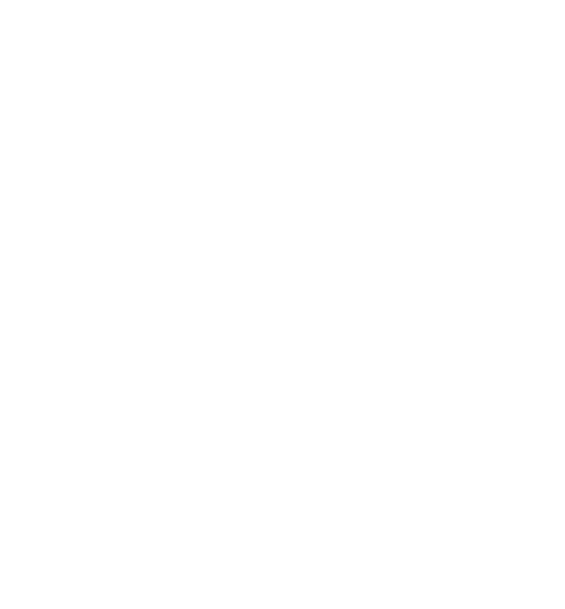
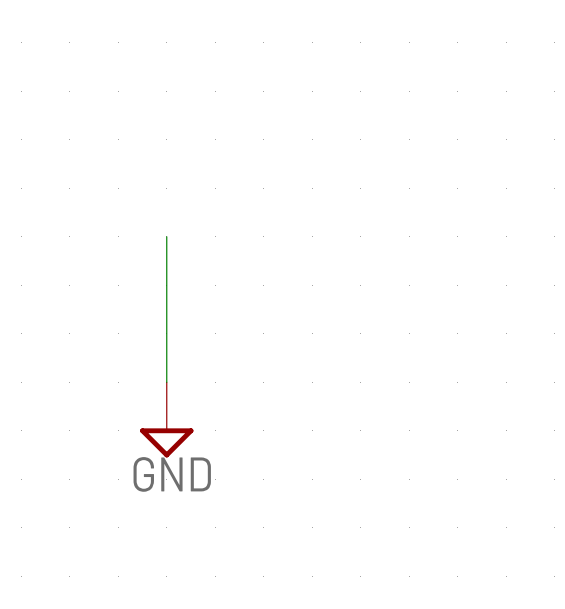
wire: none -> (166, 236) (166, 382)
power symbol: none -> GND (166, 419)

